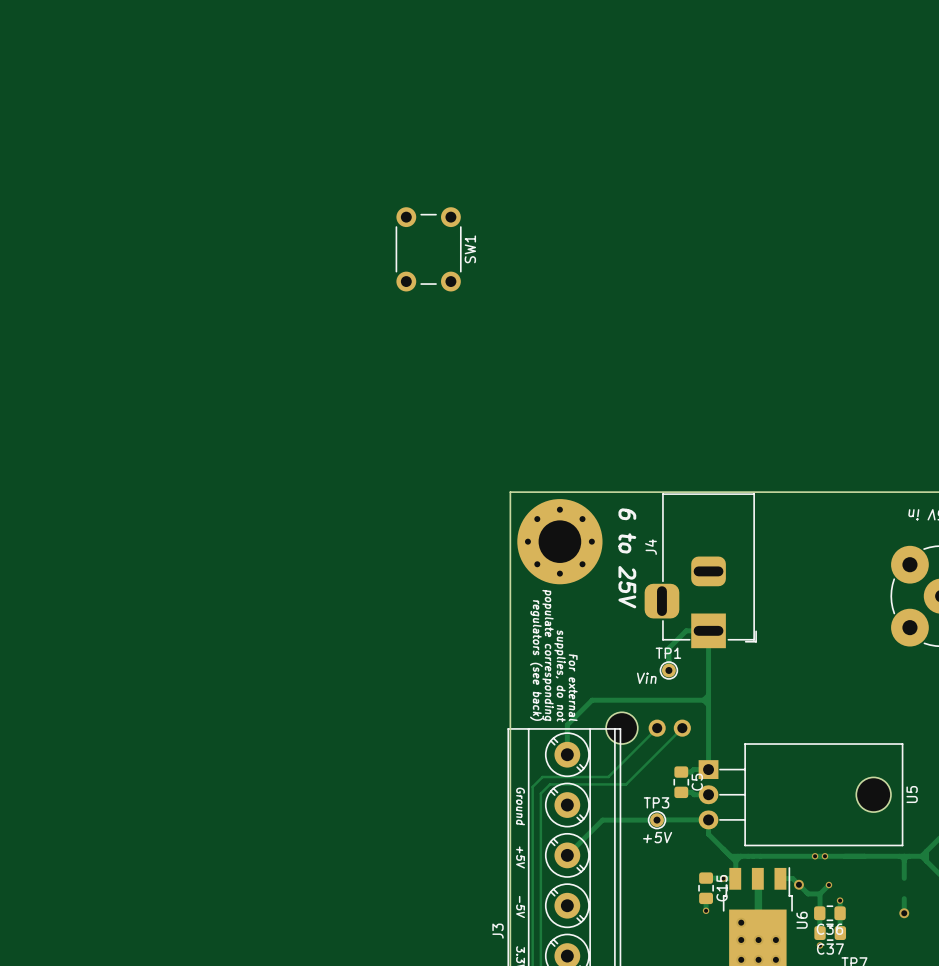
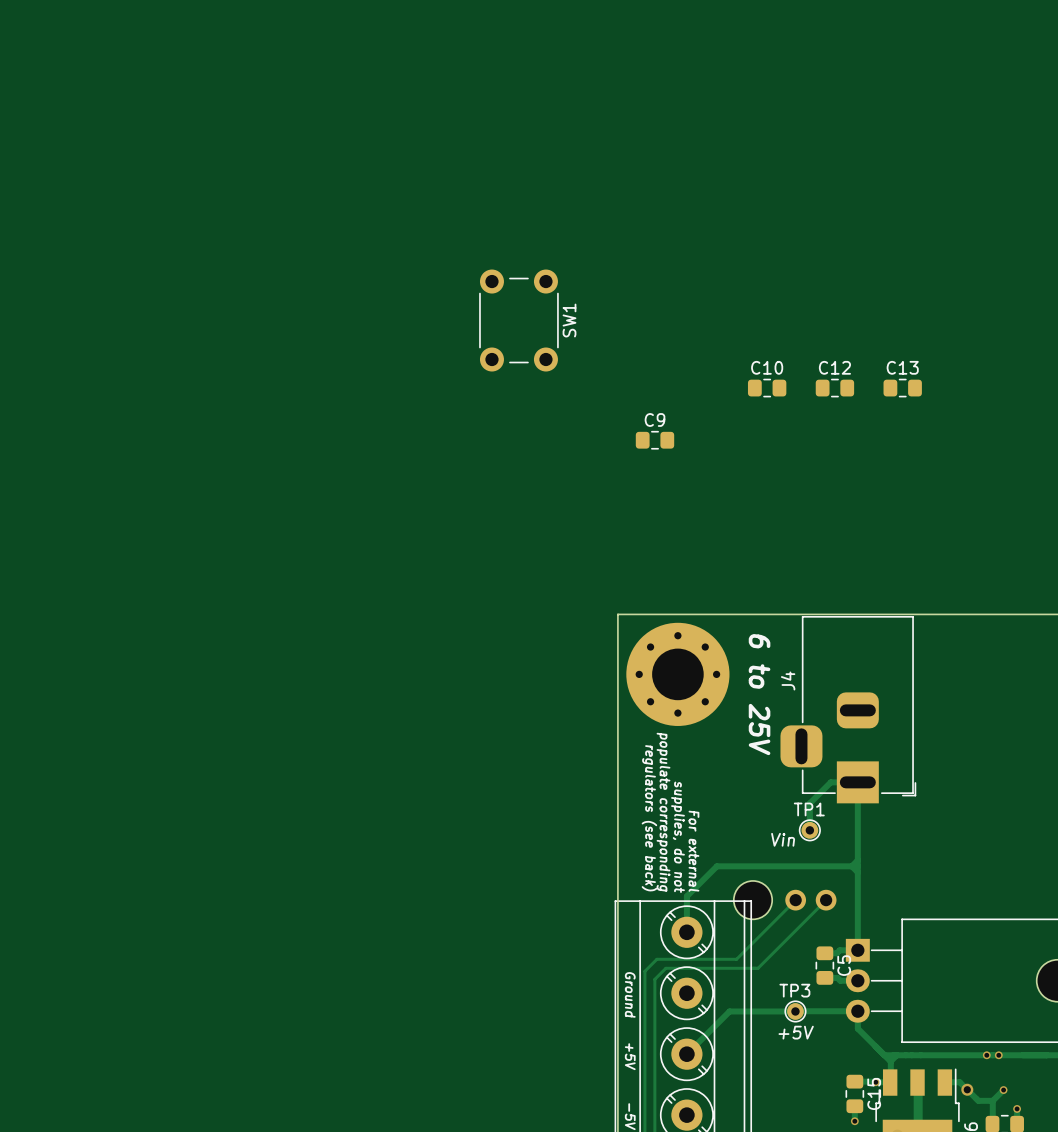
C10: none -> (767, 388)
C12: none -> (834, 388)
C13: none -> (902, 388)
C9: none -> (654, 440)

